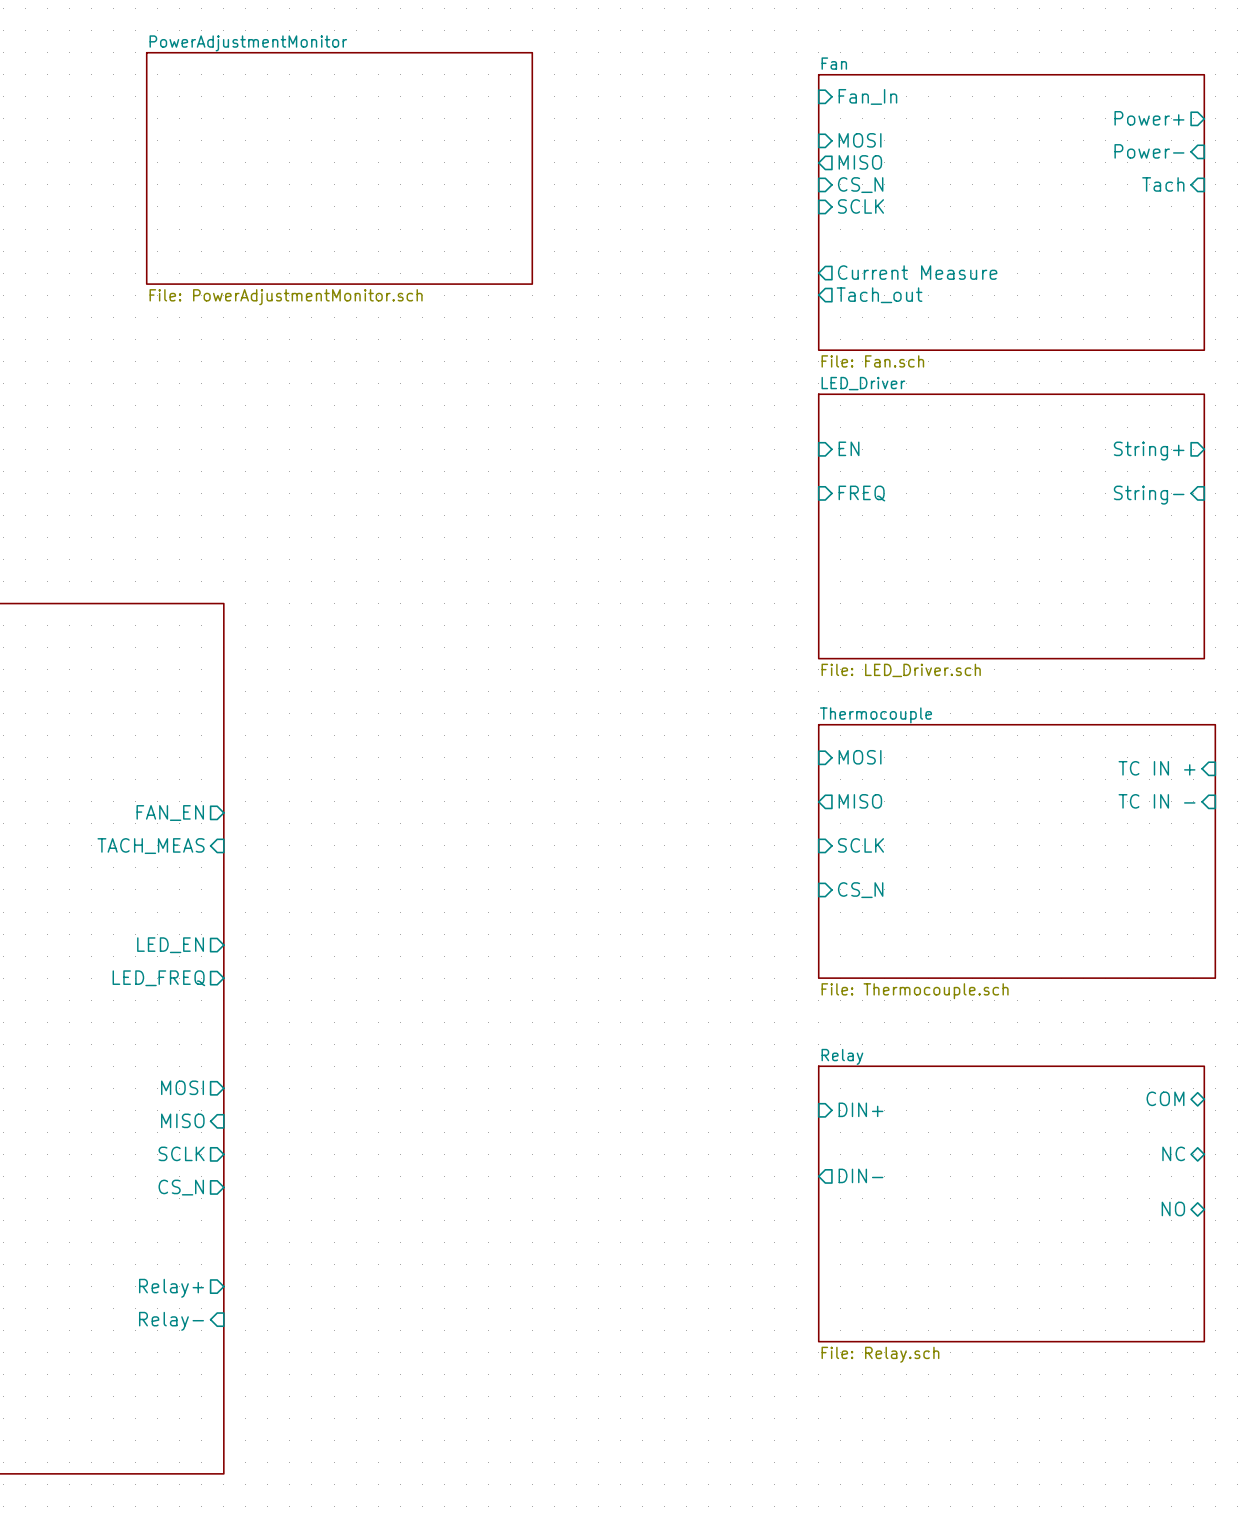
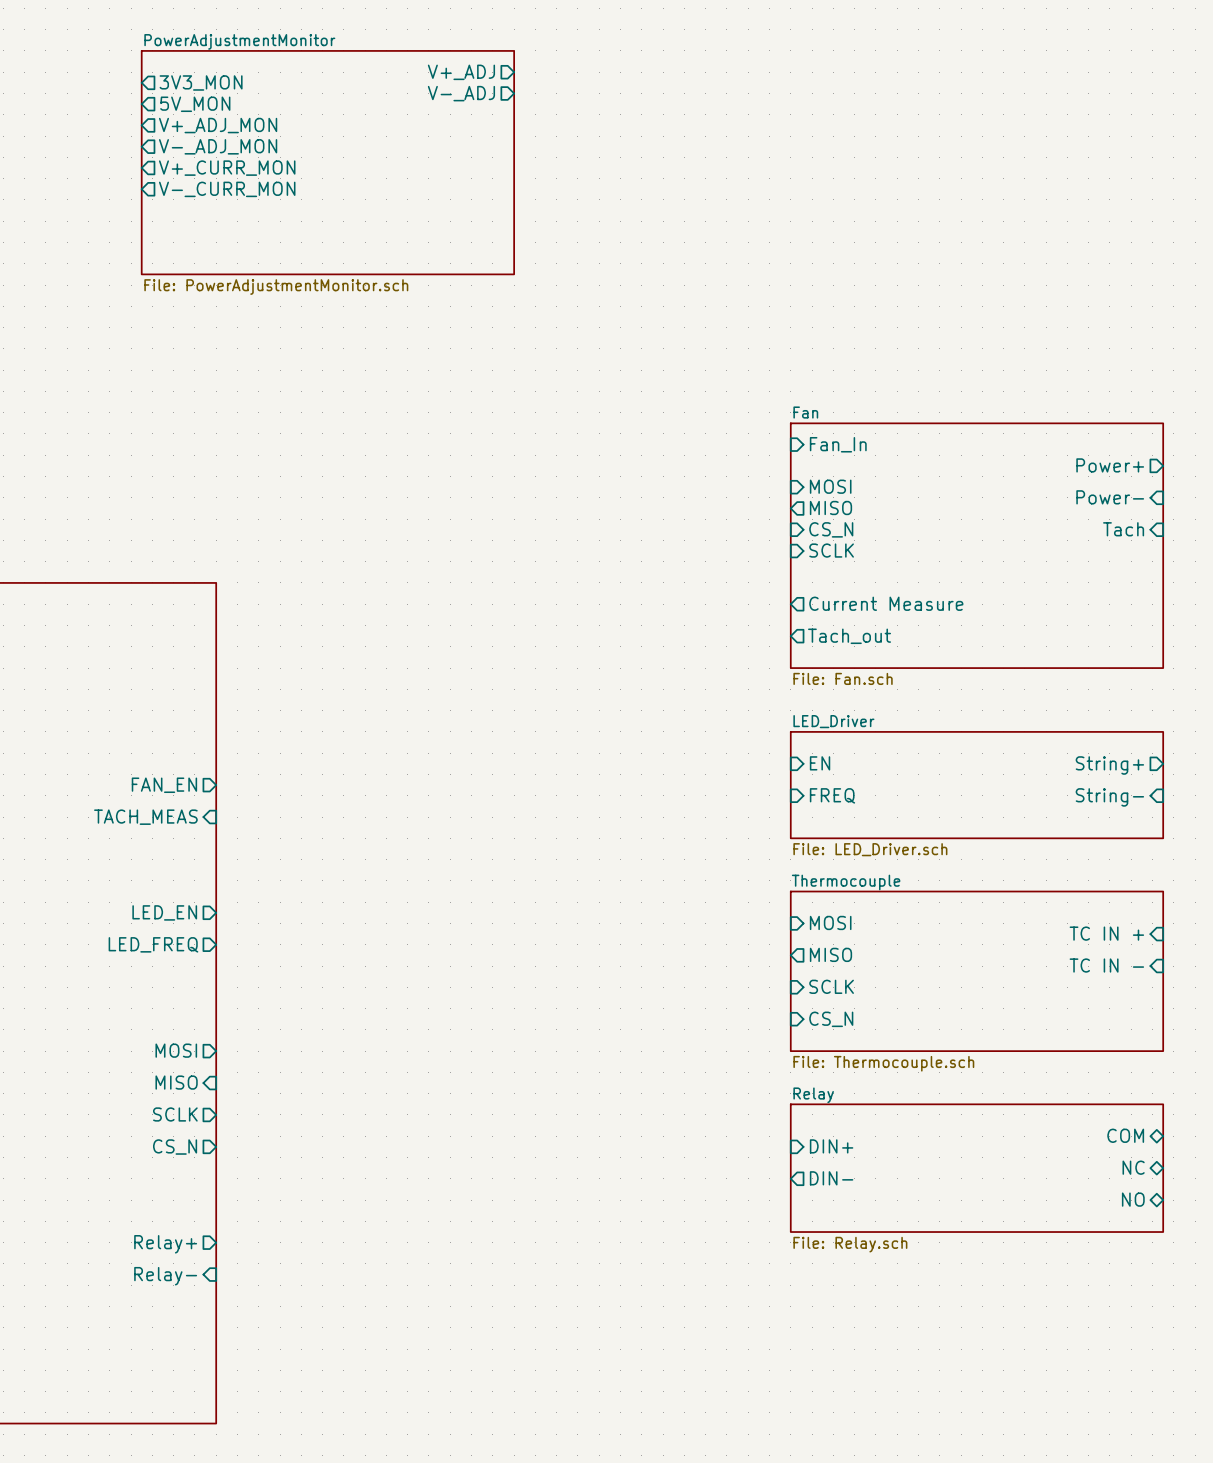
sheet pin: none -> V+_ADJ (461, 72)
sheet pin: none -> 3V3_MON (201, 82)
sheet pin: none -> V-_ADJ (461, 93)
sheet pin: Fan_In (867, 96) -> none
sheet pin: none -> 5V_MON (195, 104)
sheet pin: Power+ (1149, 118) -> none
sheet pin: none -> V+_ADJ_MON (218, 125)
sheet pin: MOSI (860, 140) -> none
sheet pin: Power- (1149, 151) -> none
sheet pin: none -> V-_ADJ_MON (218, 146)
sheet pin: MISO (860, 162) -> none
sheet pin: none -> V+_CURR_MON (227, 168)
sheet pin: Tach (1163, 184) -> none
sheet pin: CS_N (860, 185) -> none
sheet pin: none -> V-_CURR_MON (227, 189)
sheet pin: SCLK (860, 206) -> none
sheet Fan: File: Fan.sch (1011, 212) -> none
sheet pin: Current Measure (917, 272) -> none
sheet pin: Tach_out (879, 295) -> none
sheet pin: EN (849, 448) -> none
sheet pin: String+ (1149, 451) -> none
sheet pin: none -> Fan_In (838, 444)
sheet pin: none -> Power+ (1110, 465)
sheet pin: FREQ (861, 493) -> none
sheet pin: String- (1149, 495) -> none
sheet pin: none -> MOSI (830, 486)
sheet pin: none -> Power- (1110, 497)
sheet pin: none -> MISO (830, 507)
sheet LED_Driver: File: LED_Driver.sch (1011, 526) -> none
sheet pin: none -> Tach (1123, 529)
sheet pin: none -> CS_N (831, 529)
sheet Fan: none -> File: Fan.sch (976, 545)
sheet pin: none -> SCLK (831, 550)
sheet pin: none -> Current Measure (886, 603)
sheet pin: none -> Tach_out (849, 636)
sheet pin: MOSI (860, 757) -> none
sheet pin position: TC IN + (1157, 768) -> TC IN + (1106, 933)
sheet pin: none -> EN (820, 763)
sheet pin: none -> String+ (1109, 765)
sheet pin: MISO (860, 801) -> none
sheet pin position: TC IN - (1157, 801) -> TC IN - (1106, 965)
sheet LED_Driver: none -> File: LED_Driver.sch (976, 785)
sheet pin: none -> FREQ (832, 795)
sheet pin: none -> String- (1109, 797)
sheet pin: SCLK (860, 845) -> none
sheet Thermocouple: File: Thermocouple.sch (1017, 851) -> none
sheet pin position: CS_N (860, 890) -> CS_N (831, 1019)
sheet pin: none -> MOSI (830, 922)
sheet pin: none -> MISO (830, 954)
sheet Thermocouple: none -> File: Thermocouple.sch (976, 971)
sheet pin: none -> SCLK (831, 986)
sheet Relay name position: Relay (842, 1056) -> Relay (813, 1095)
sheet Relay shape: [818, 1066, 1205, 1342] -> [790, 1104, 1164, 1233]
sheet pin position: COM (1165, 1098) -> COM (1125, 1135)
sheet pin position: DIN+ (860, 1109) -> DIN+ (831, 1146)
sheet pin: NC (1173, 1153) -> none
sheet pin position: DIN- (860, 1175) -> DIN- (831, 1178)
sheet pin: NO (1173, 1208) -> NC (1133, 1167)
sheet pin: none -> NO (1133, 1199)
sheet Relay value position: File: Relay.sch (880, 1354) -> File: Relay.sch (850, 1244)

